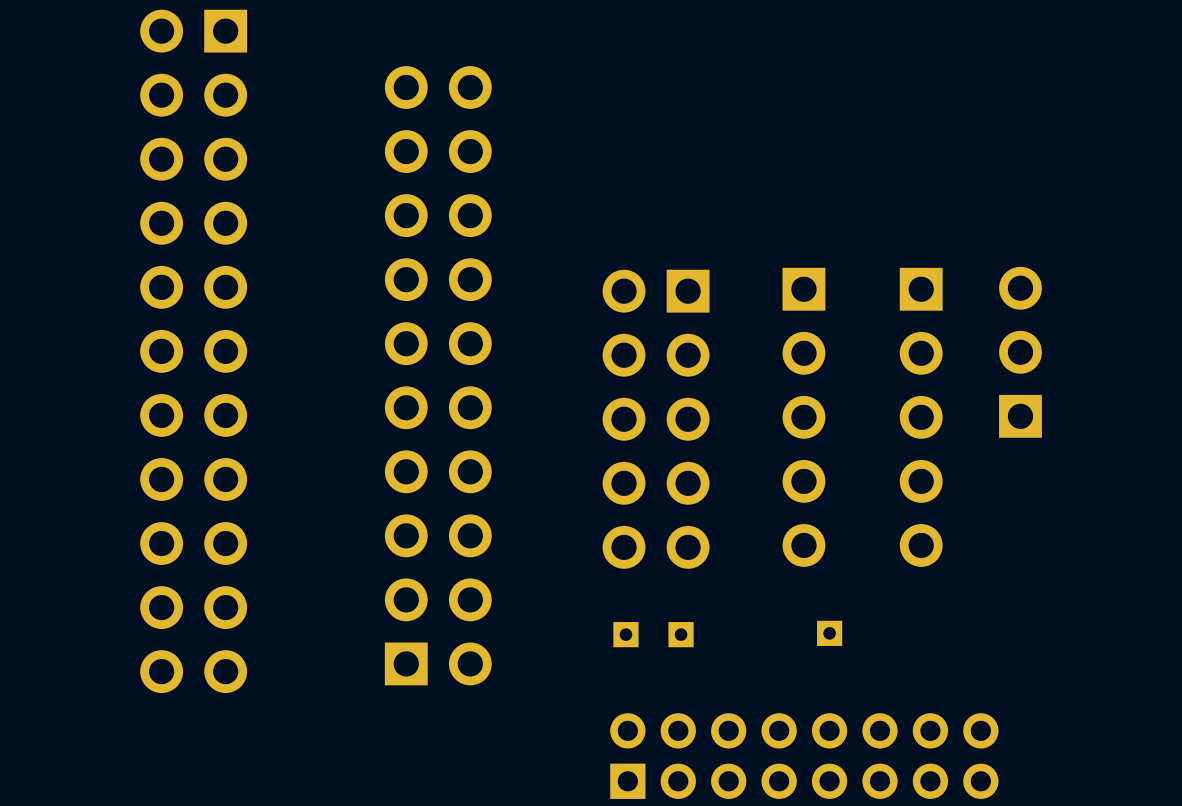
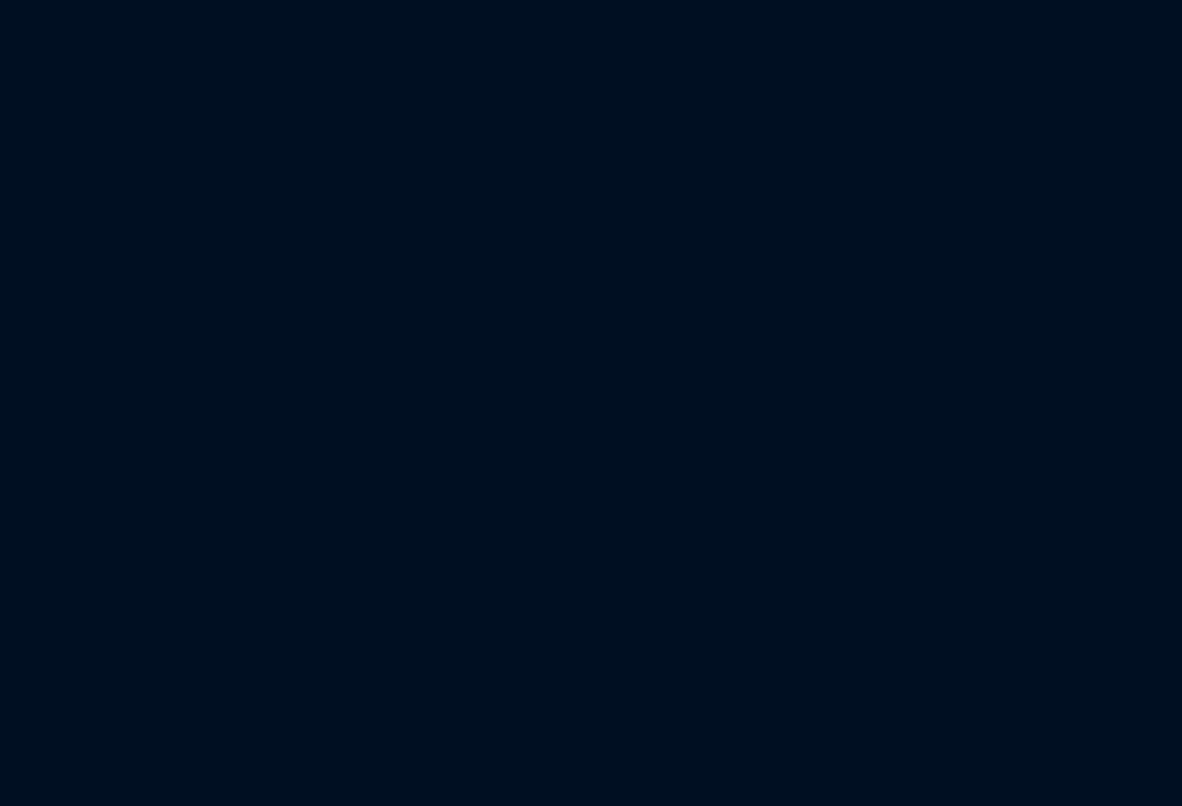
part: (193, 351) -> none
part: (1020, 352) -> none
part: (438, 375) -> none
part: (803, 417) -> none
part: (921, 417) -> none
part: (656, 419) -> none
part: (829, 633) -> none
part: (625, 634) -> none
part: (681, 634) -> none
part: (804, 756) -> none

